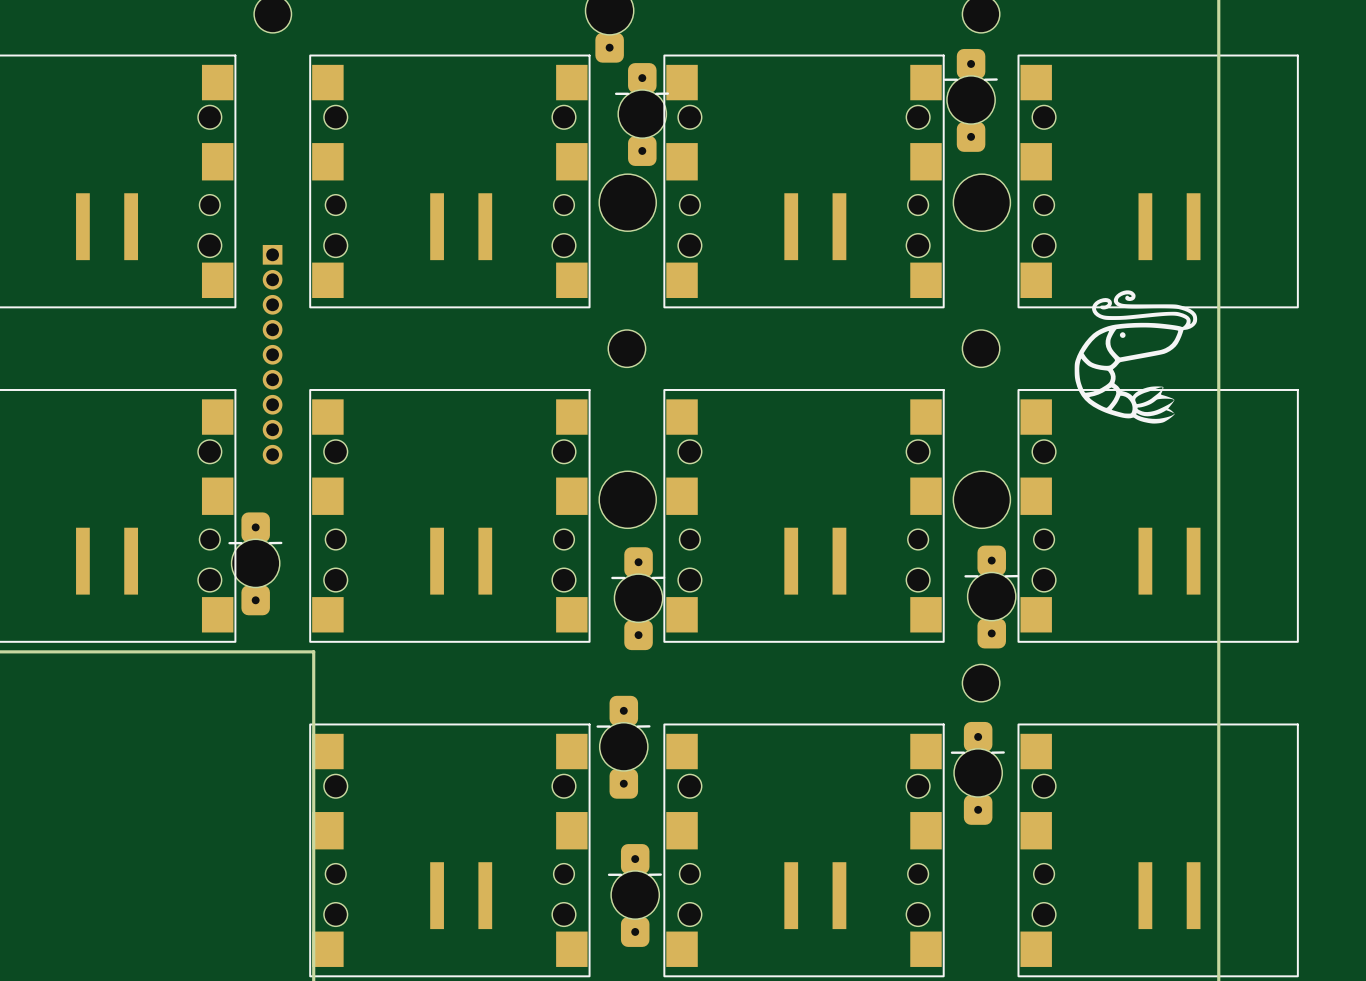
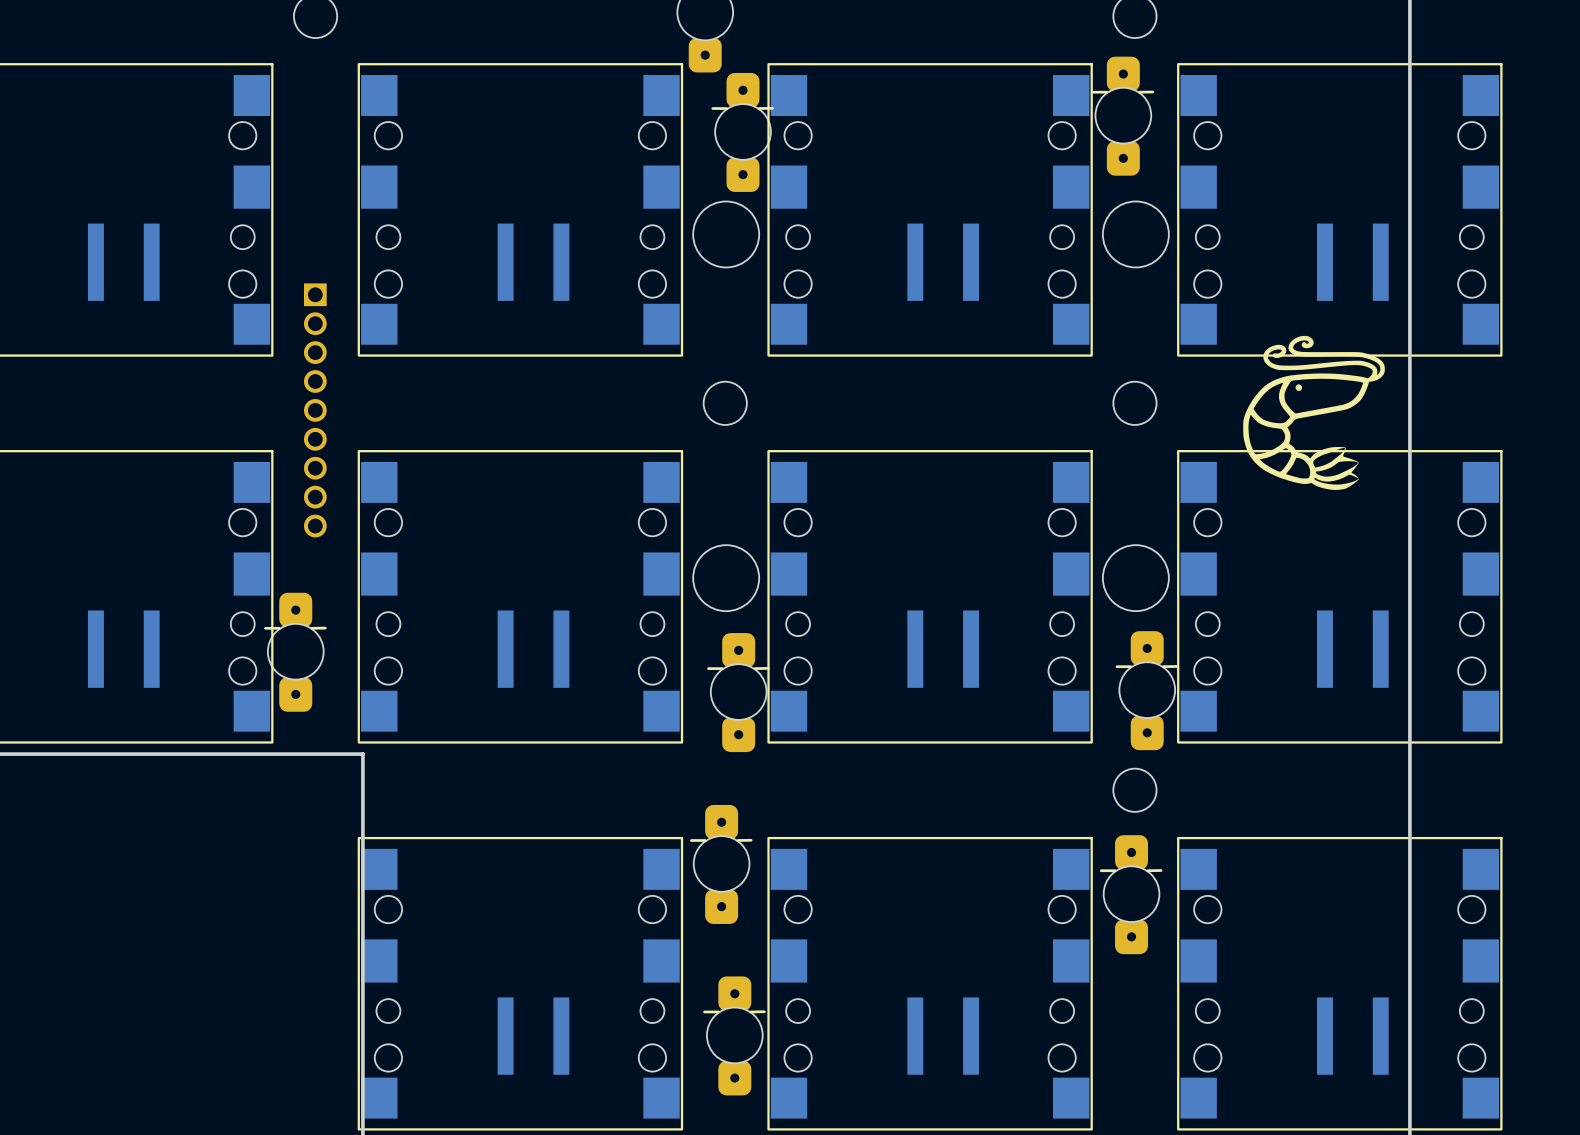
part footprint: [1017, 54, 1299, 309] -> [1177, 63, 1503, 357]
part footprint: [1017, 389, 1299, 643] -> [1177, 450, 1503, 744]
part footprint: [1017, 723, 1299, 978] -> [1177, 836, 1503, 1131]

